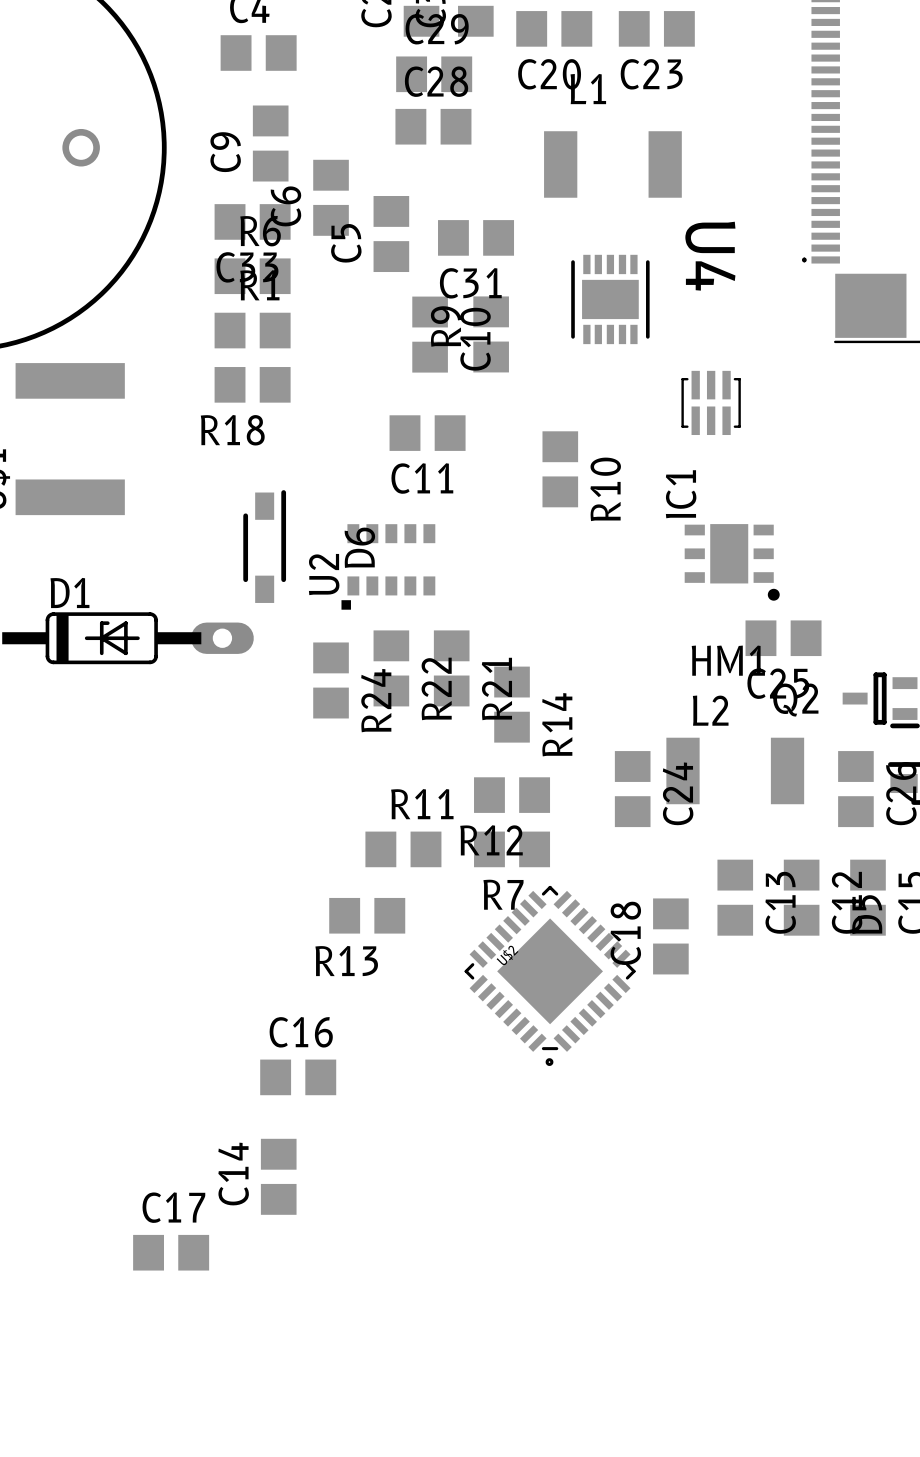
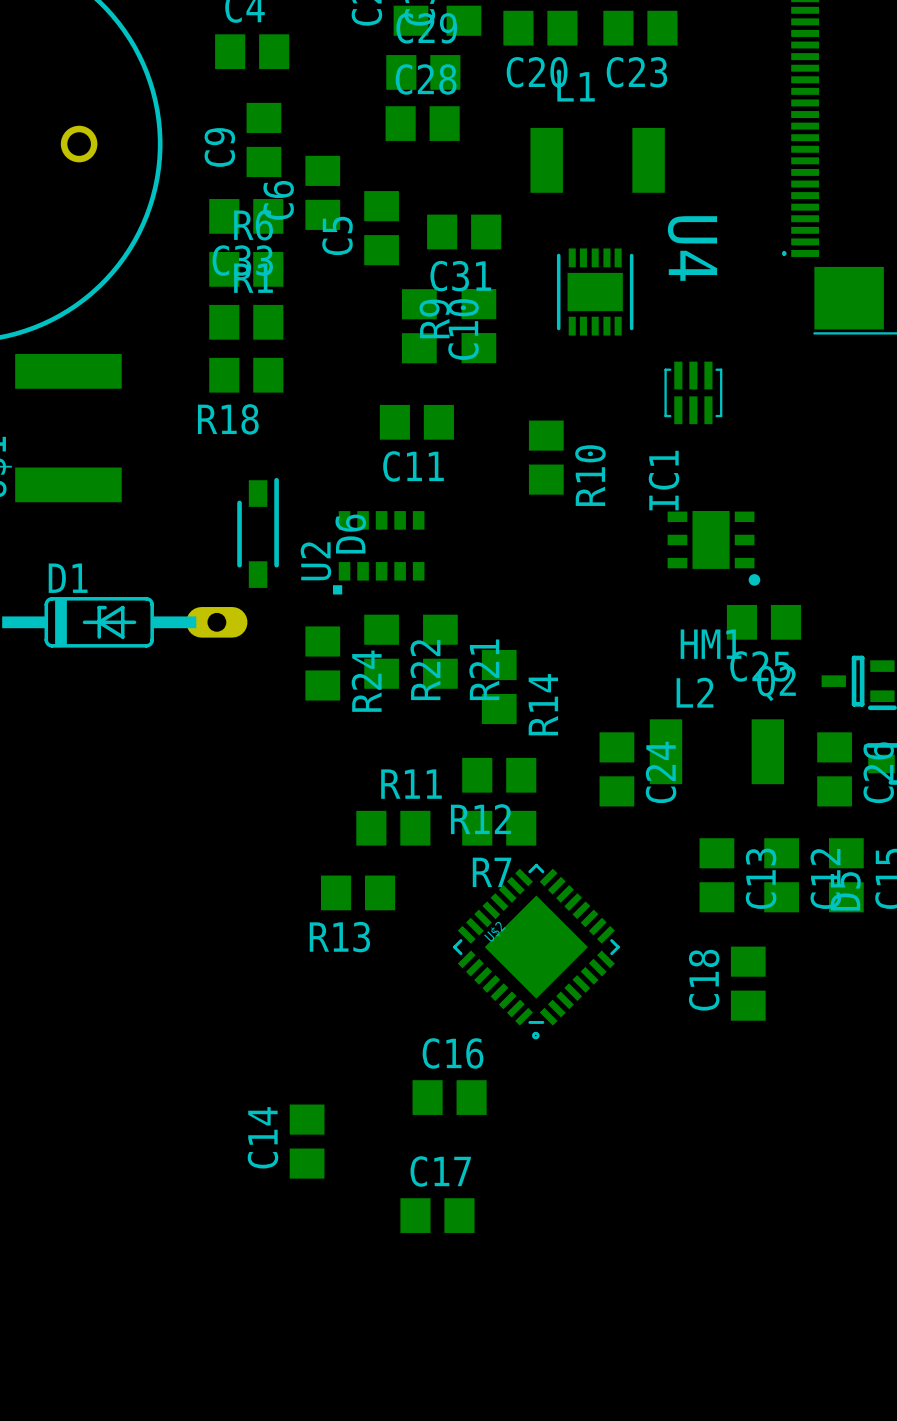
C18 position: (670, 936) -> (748, 983)
C16 position: (298, 1077) -> (449, 1097)
C14 position: (278, 1176) -> (307, 1141)
C17 position: (171, 1252) -> (437, 1215)

